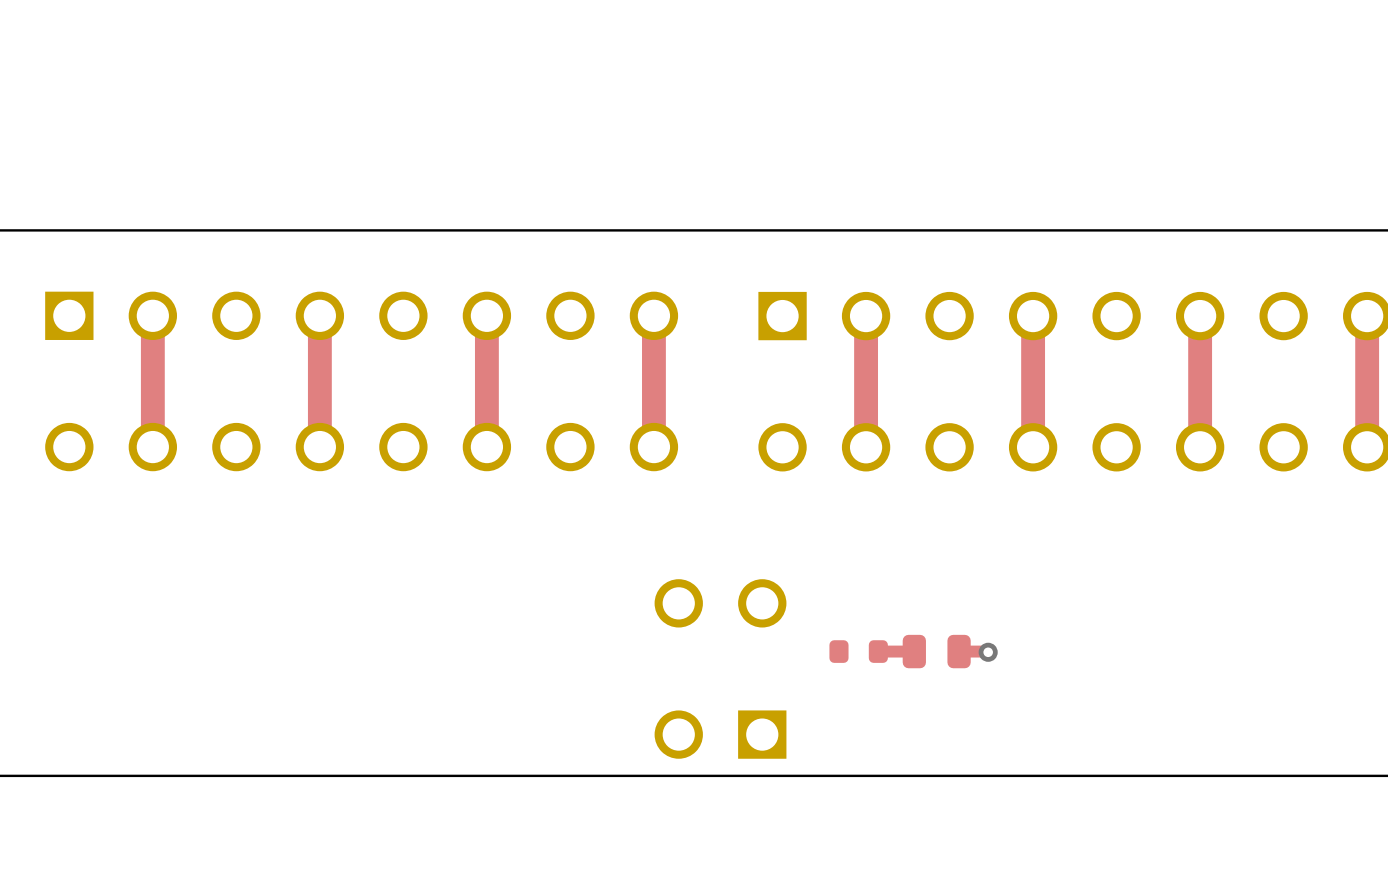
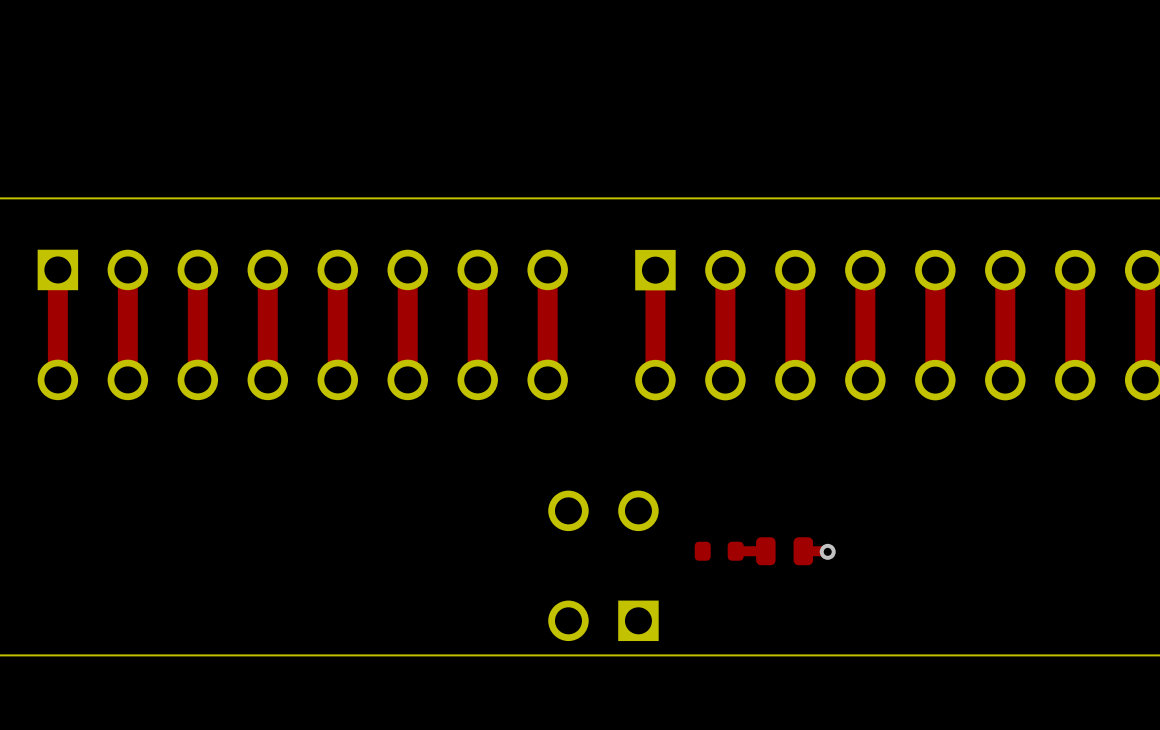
top track: none -> (57, 269) (57, 379)
top track: none -> (197, 269) (197, 379)
top track: none -> (337, 269) (337, 379)
top track: none -> (477, 269) (477, 379)
top track: none -> (655, 270) (655, 380)
top track: none -> (795, 270) (795, 380)
top track: none -> (935, 270) (935, 380)
top track: none -> (1075, 270) (1075, 380)

